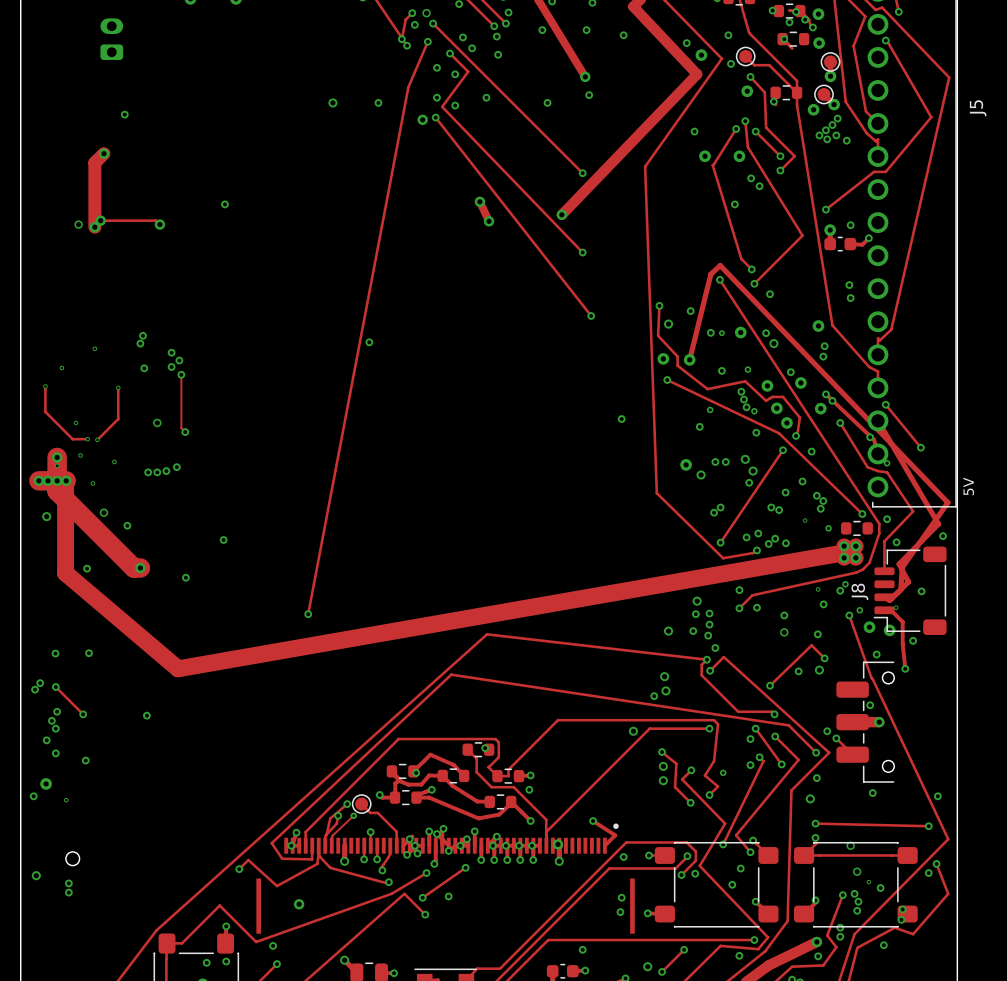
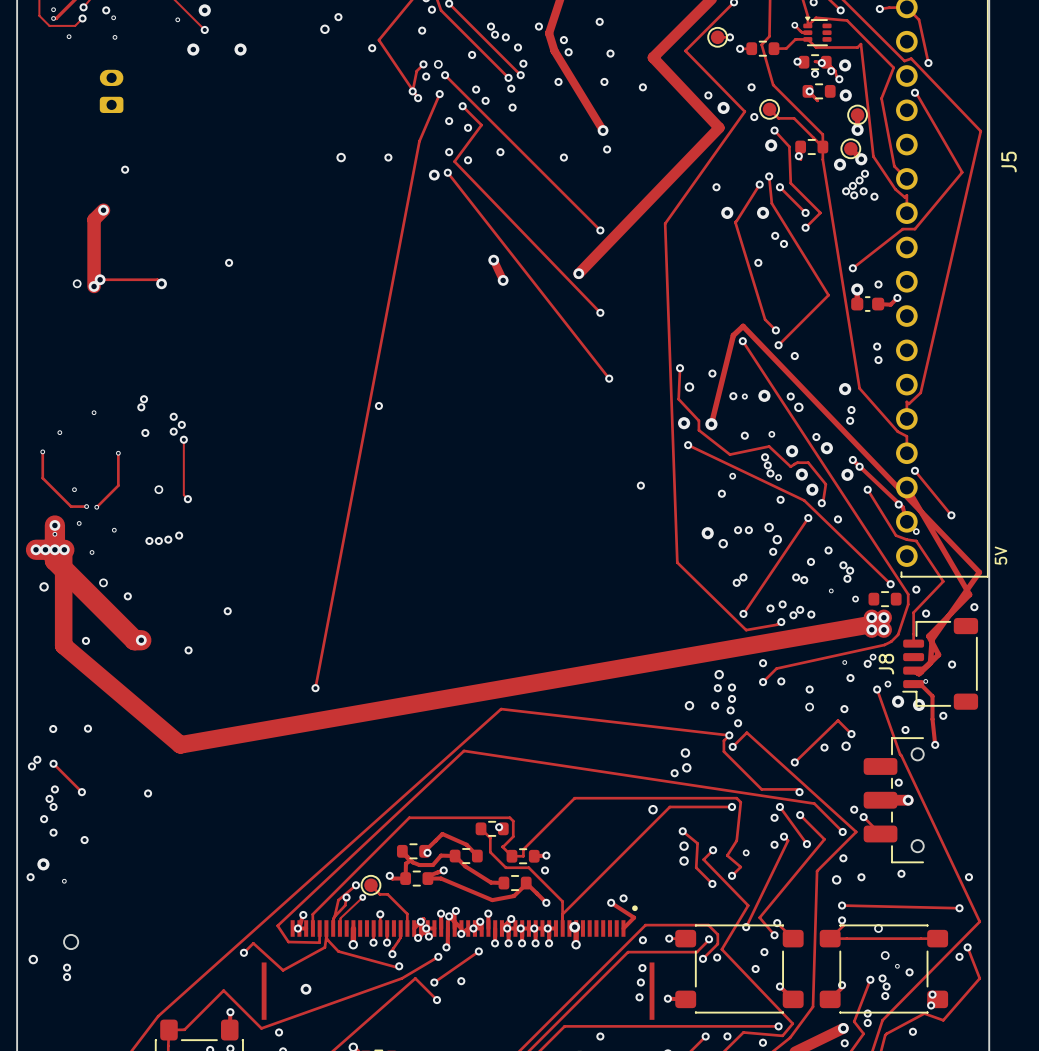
via: none -> (861, 877)
via: none -> (623, 898)
via: none -> (642, 968)
via: none -> (727, 1036)

